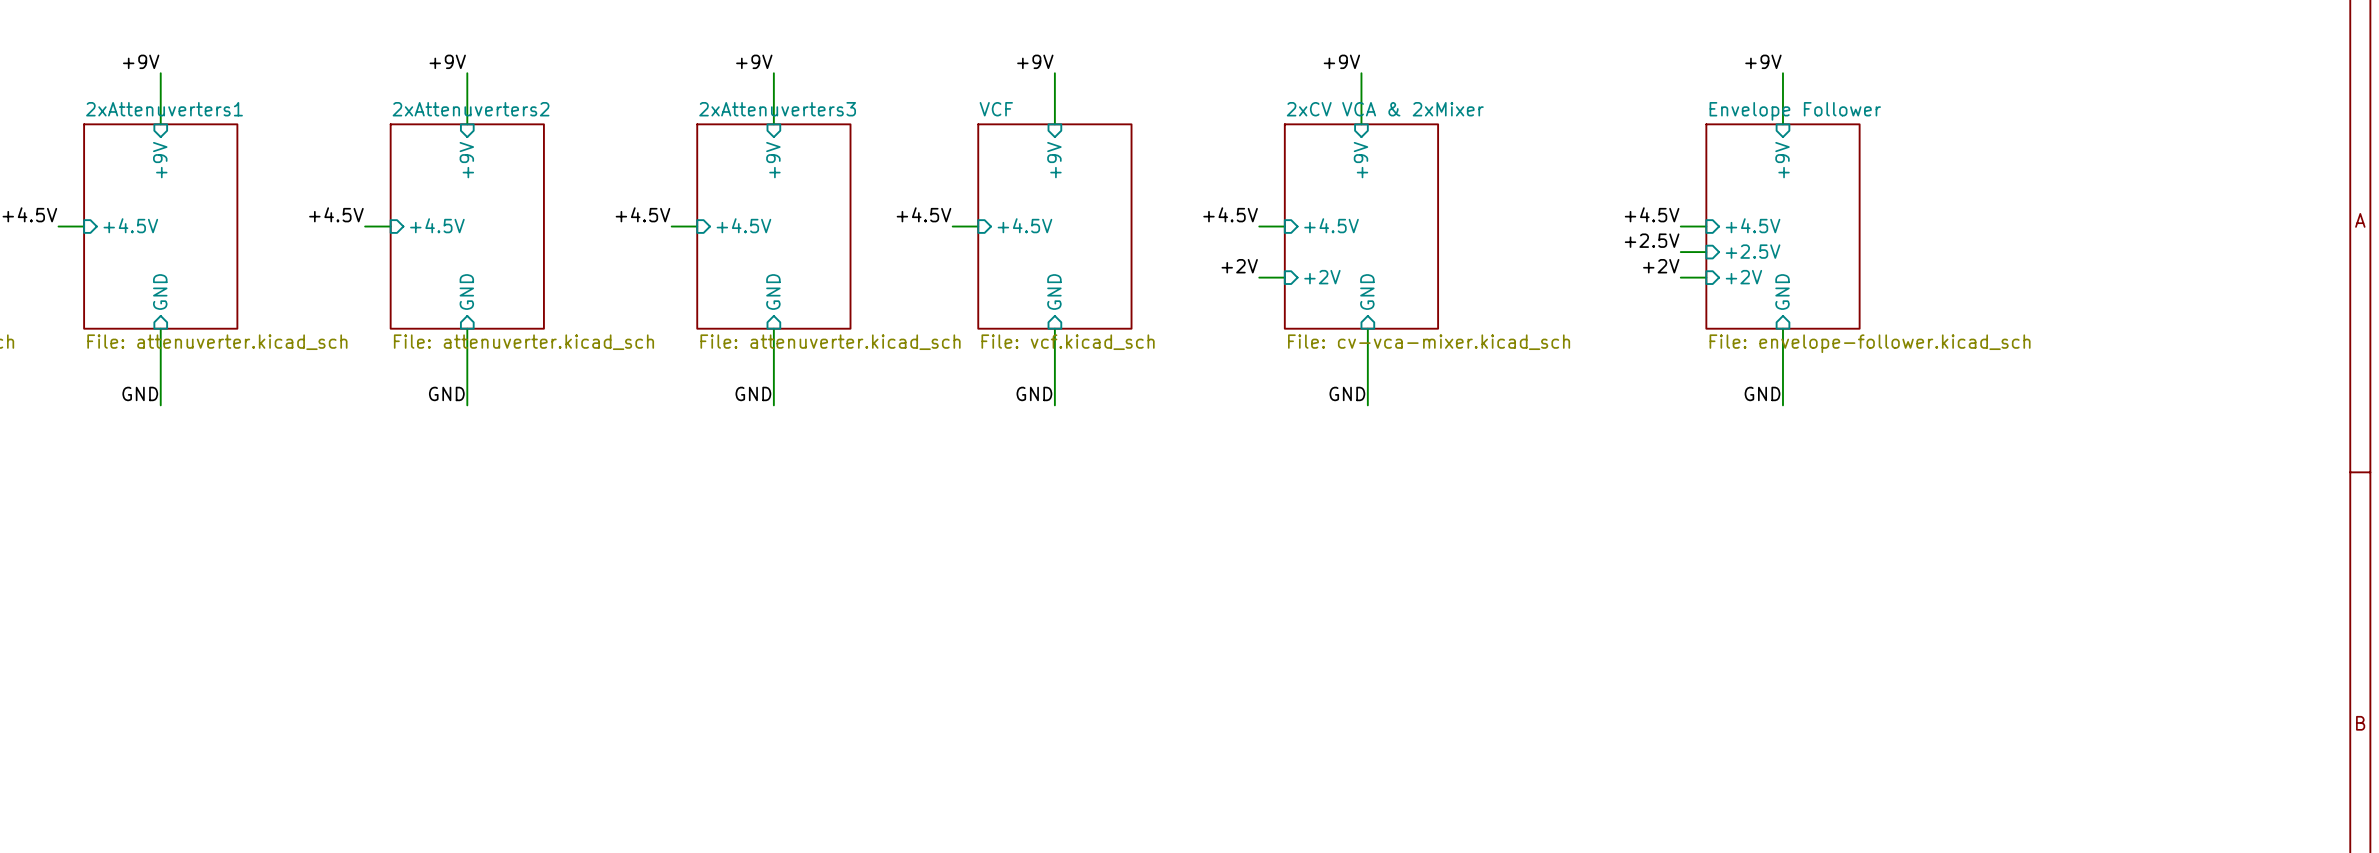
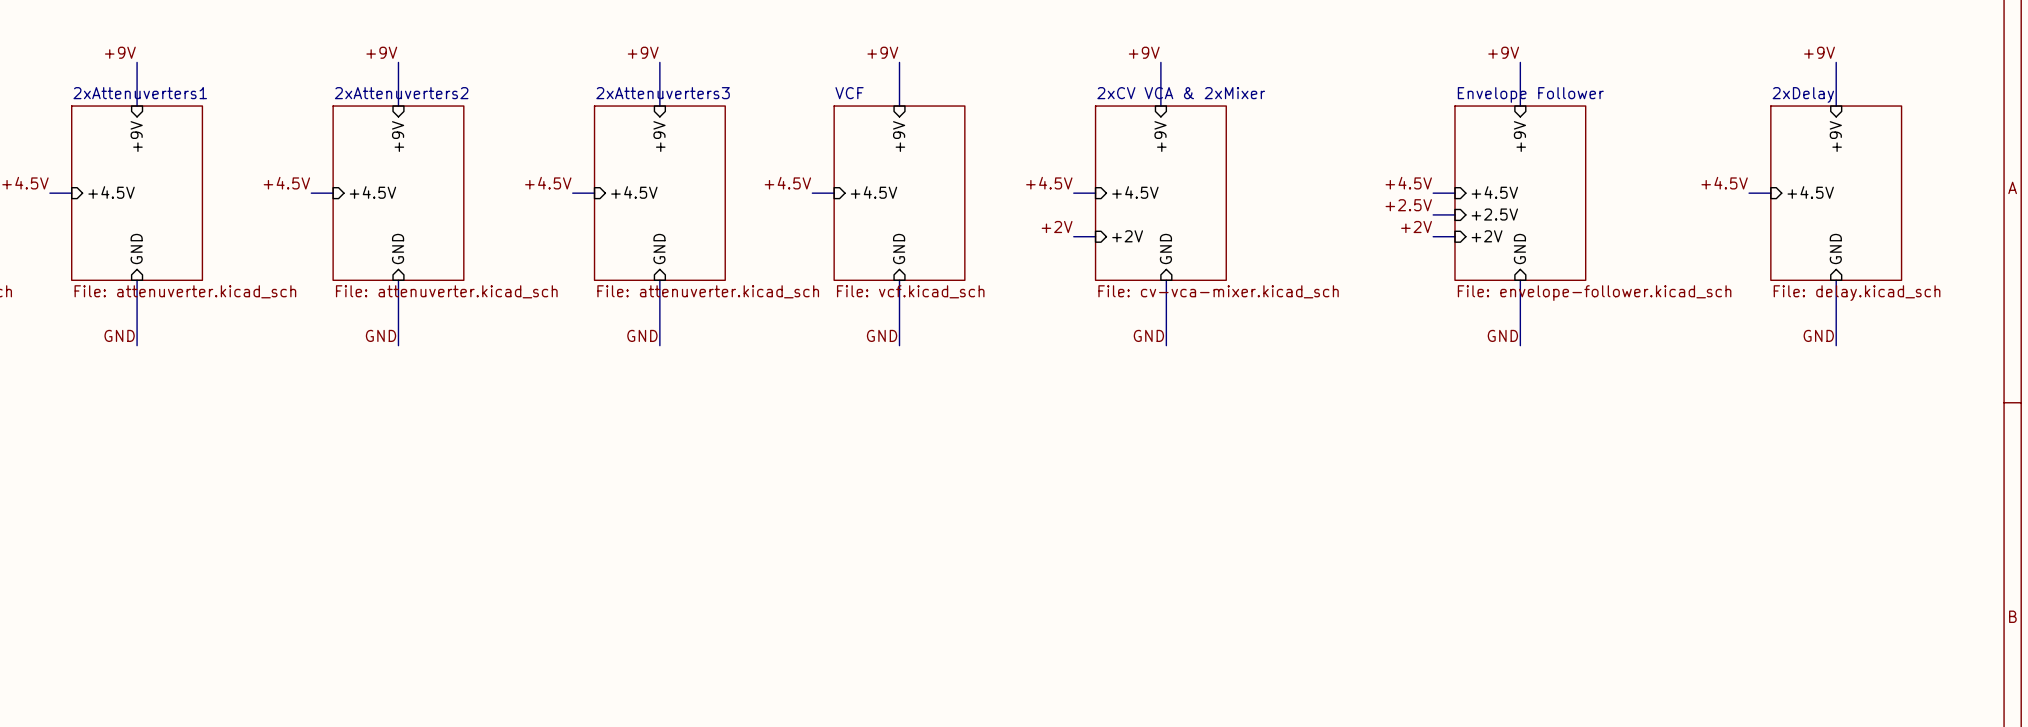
label: none -> +9V (1819, 52)
wire: none -> (1836, 62) (1836, 106)
sheet pin: none -> +9V (1835, 136)
label: none -> +4.5V (1724, 183)
sheet pin: none -> +4.5V (1810, 192)
wire: none -> (1749, 193) (1770, 193)
sheet 2xDelay: none -> File: delay.kicad_sch (1836, 193)
sheet pin: none -> GND (1835, 249)
wire: none -> (1836, 280) (1836, 345)
label: none -> GND (1818, 335)

